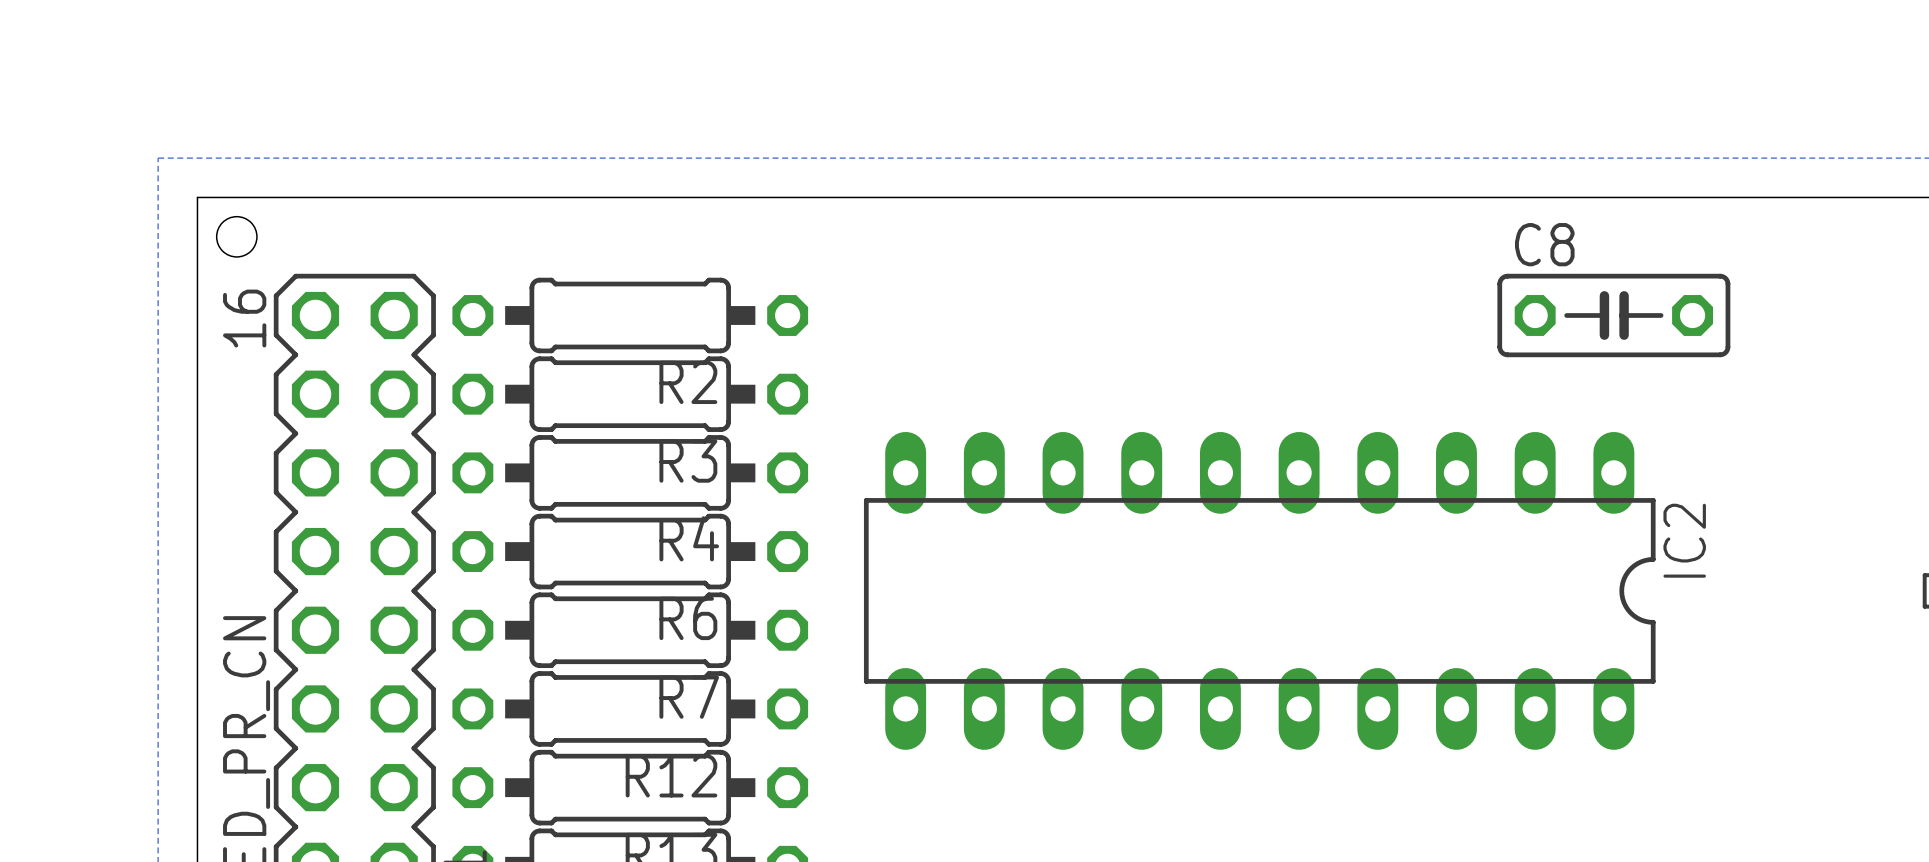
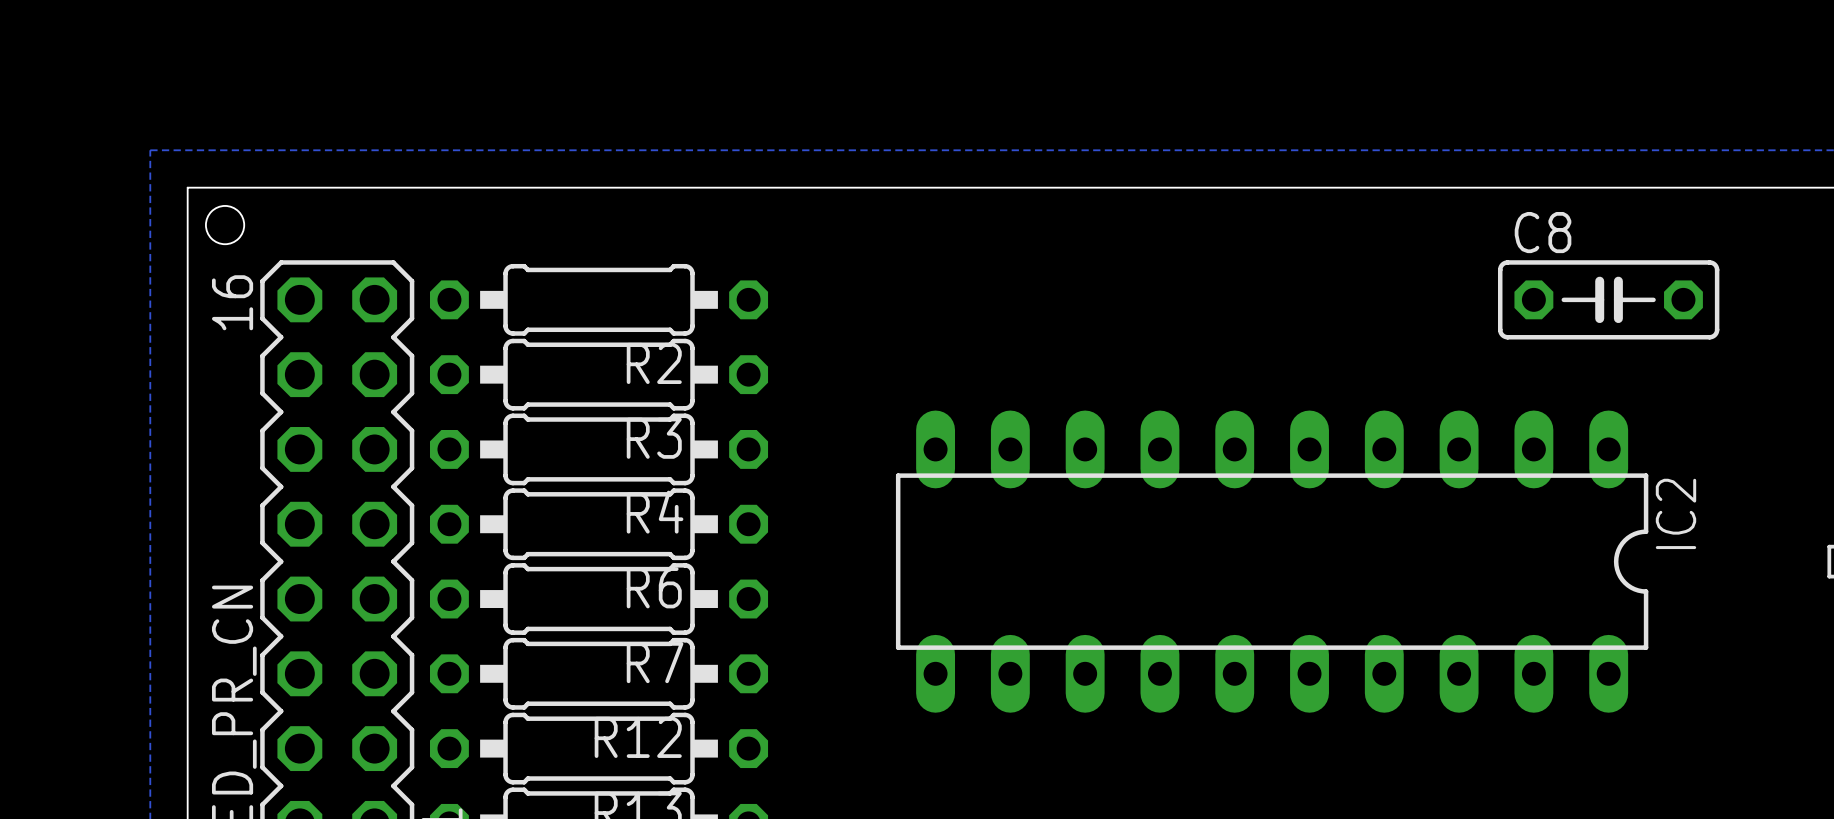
C8 position: (1613, 315) -> (1608, 299)
IC2 position: (1259, 590) -> (1272, 561)

